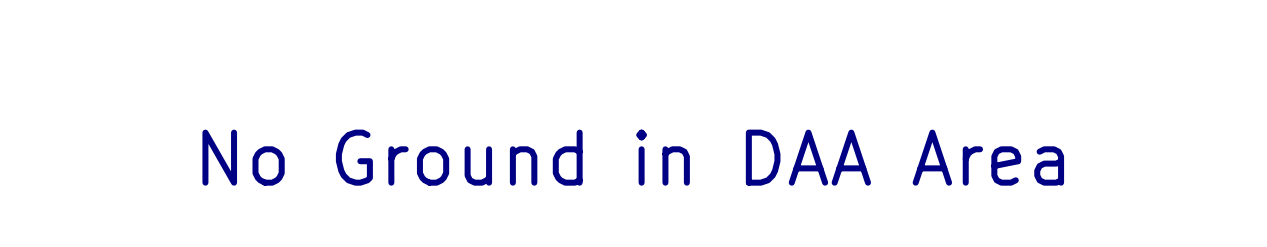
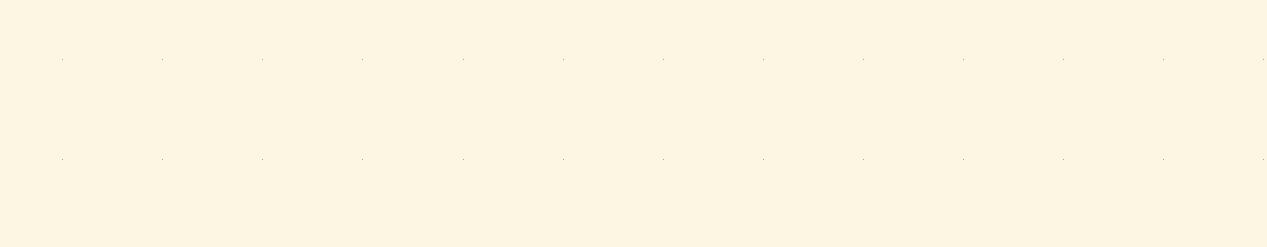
text: No Ground in DAA Area (633, 157) -> none

